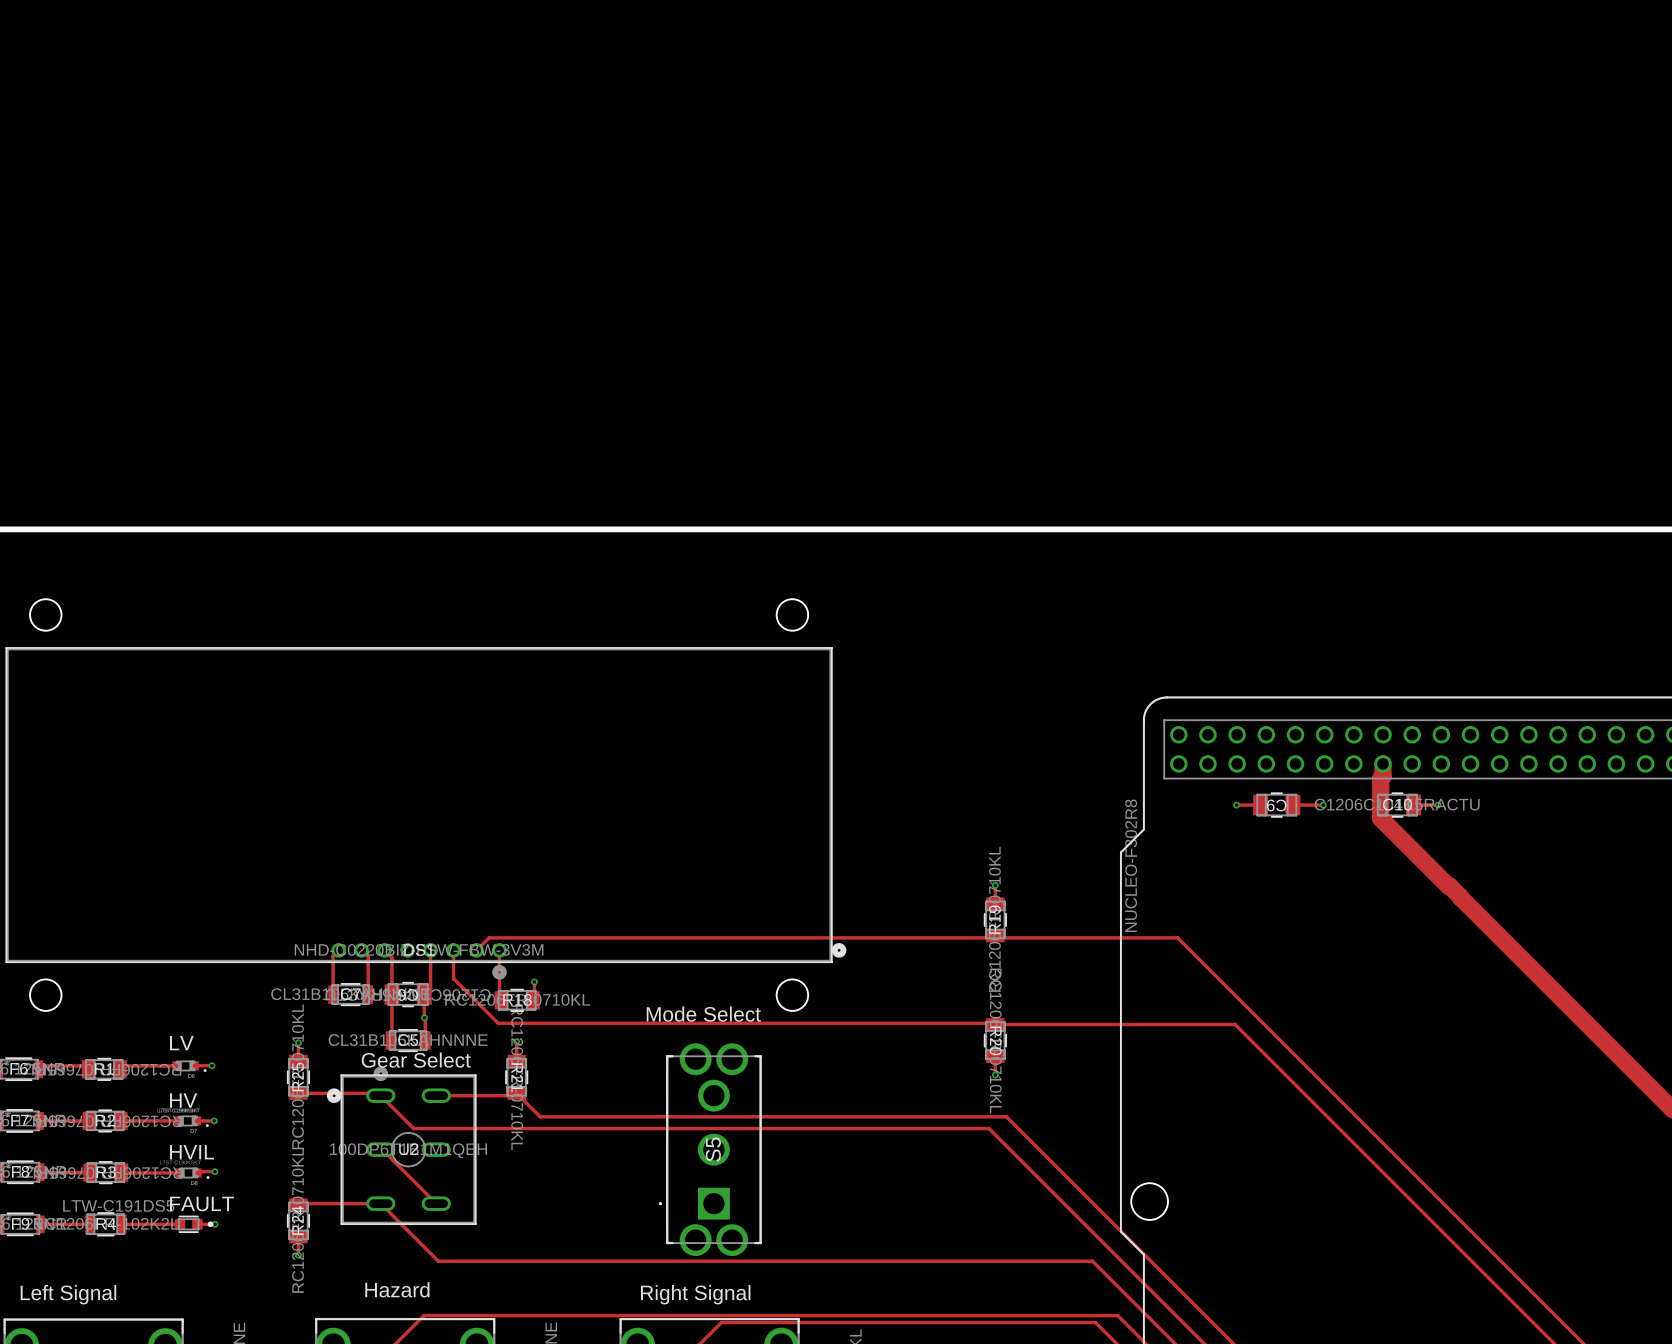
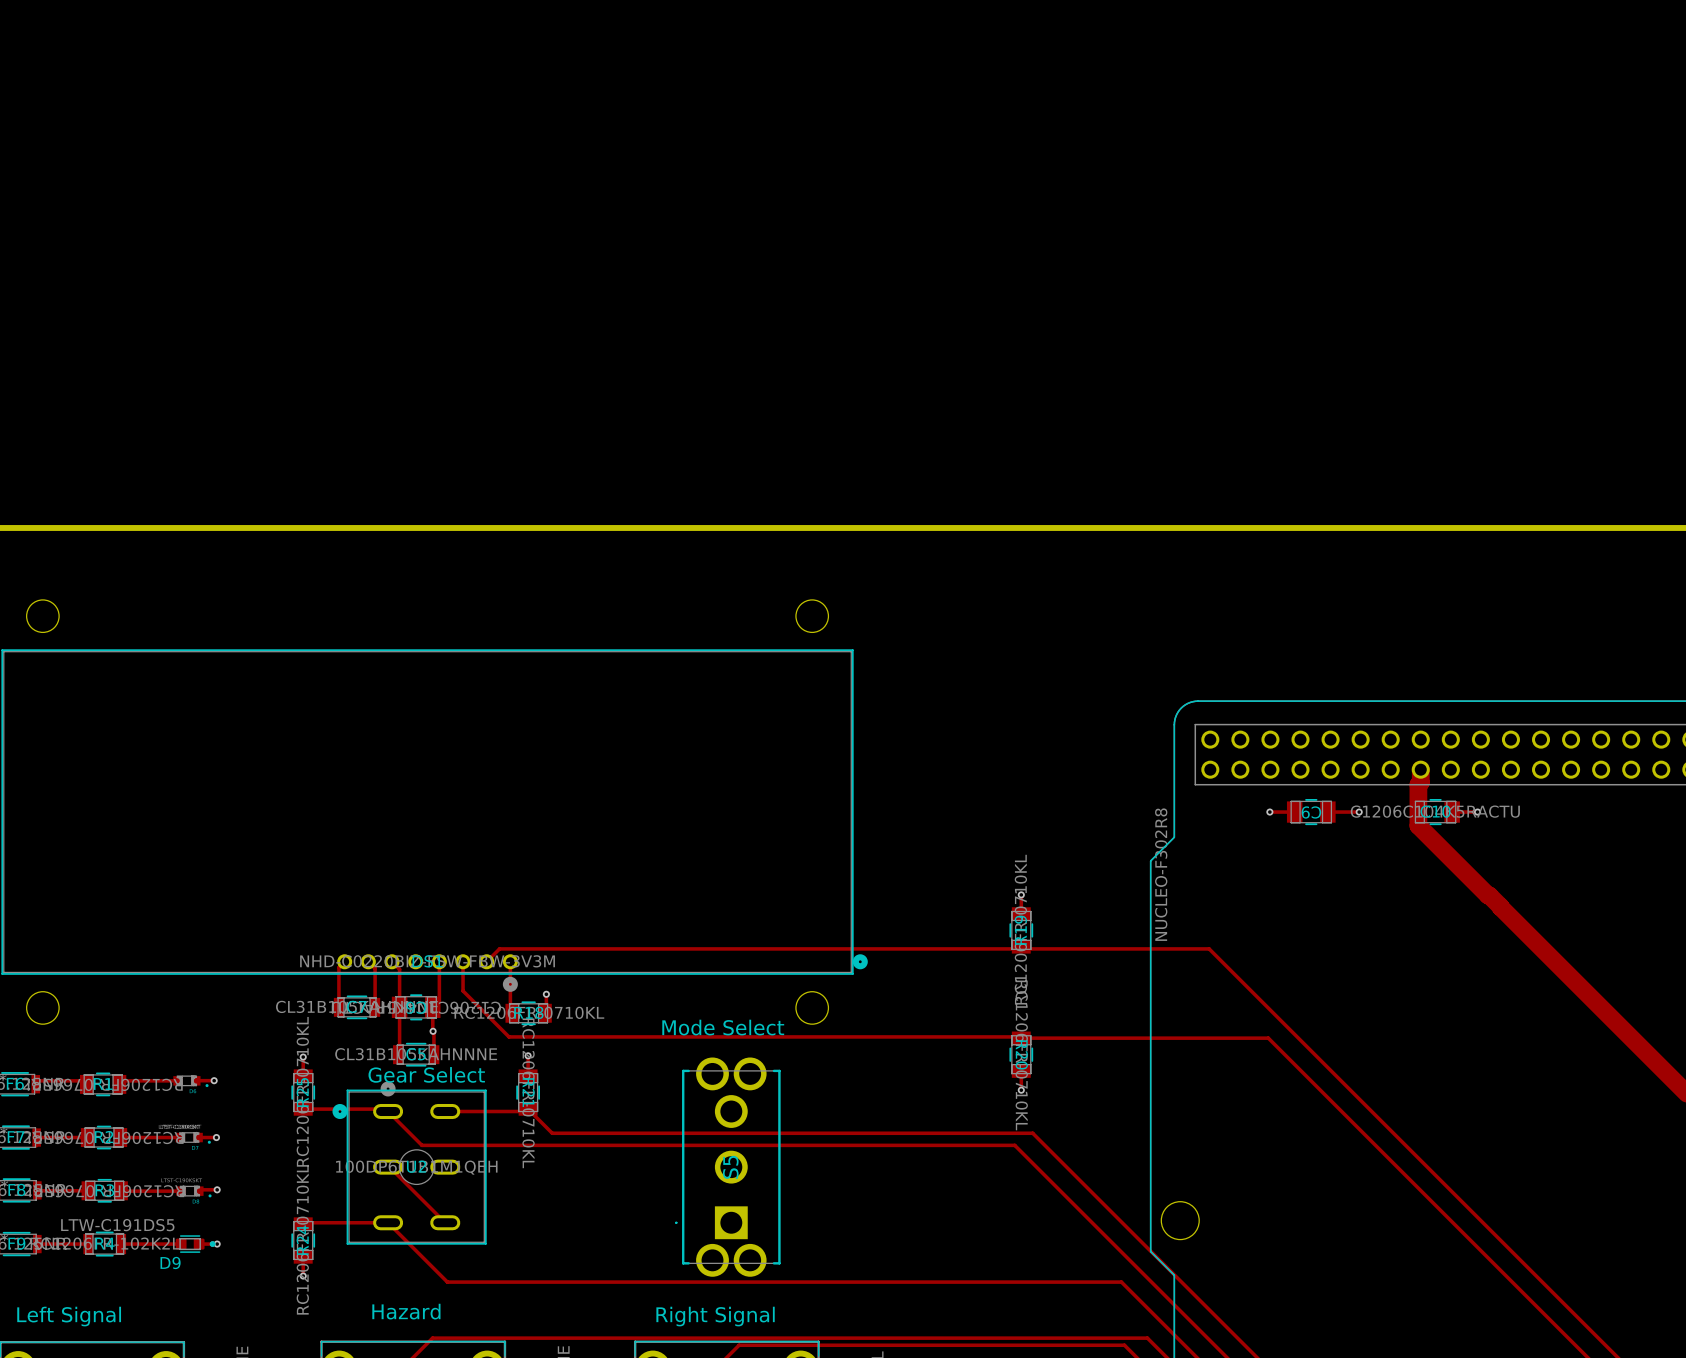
text: LV (181, 1043) -> none
text: HV (183, 1100) -> none
text: HVIL (192, 1152) -> none
text: FAULT (201, 1204) -> none
D9 name: none -> D9 (170, 1262)

